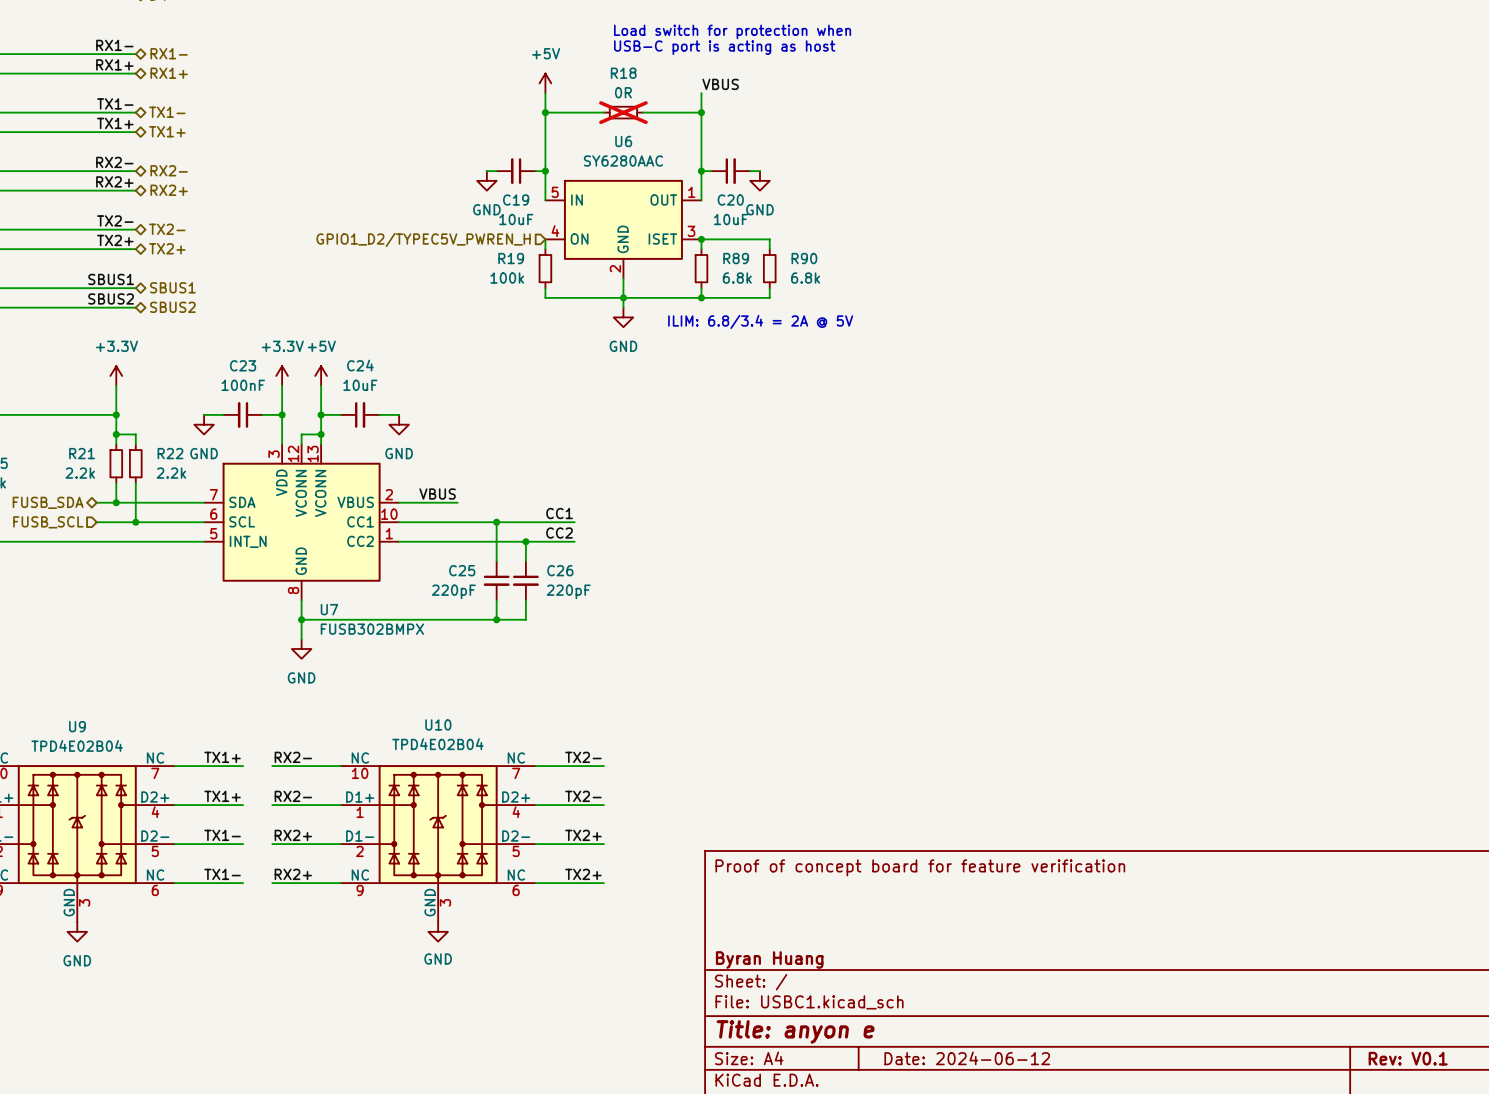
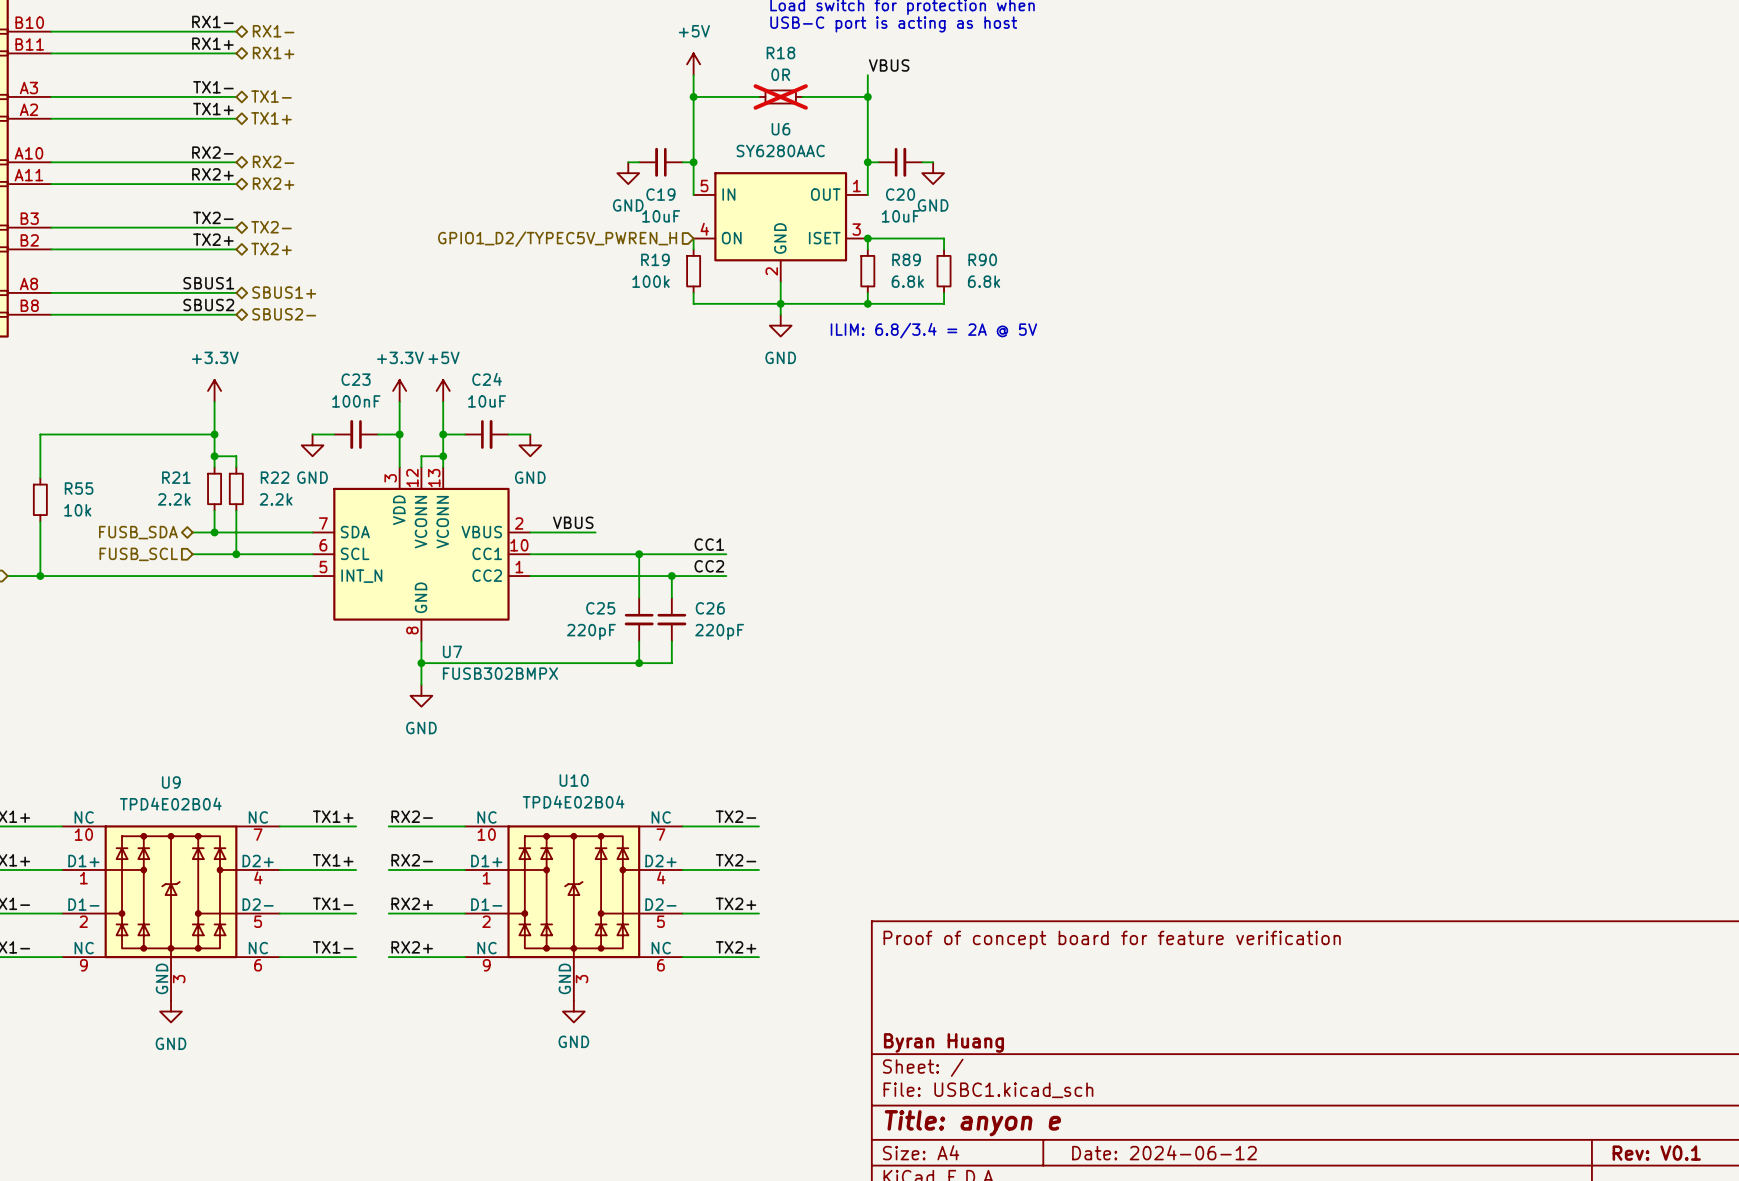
hierarchical label: SBUS1 (172, 287) -> SBUS1+ (284, 292)
hierarchical label: SBUS2 (172, 307) -> SBUS2- (284, 314)

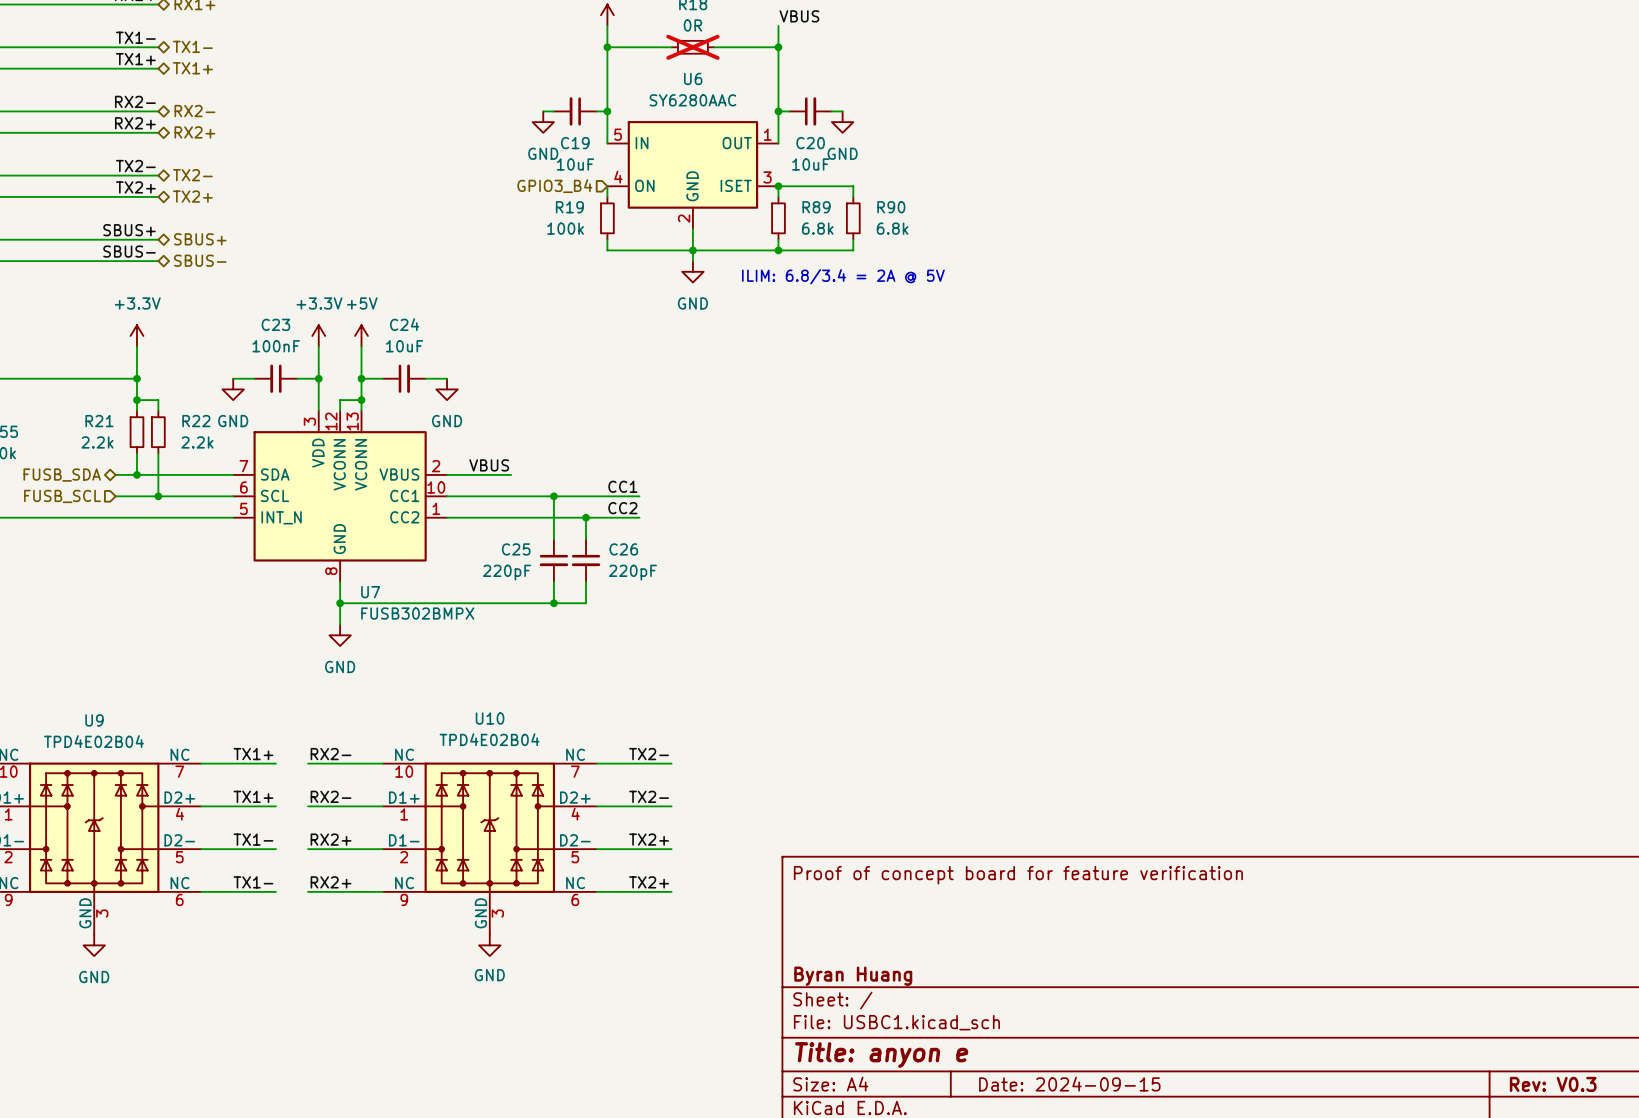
hierarchical label: GPIO1_D2/TYPEC5V_PWREN_H (557, 239) -> GPIO3_B4 (554, 186)
label: SBUS1 (208, 283) -> SBUS+ (129, 230)
hierarchical label: SBUS1+ (284, 292) -> SBUS+ (200, 239)
label: SBUS2 (208, 305) -> SBUS- (129, 251)
hierarchical label: SBUS2- (284, 314) -> SBUS- (200, 260)
title block: Date: 2024-06-12 (1164, 1152) -> Date: 2024-09-15 (1069, 1084)
title block: Rev: V0.1 (1656, 1153) -> Rev: V0.3 (1553, 1084)

